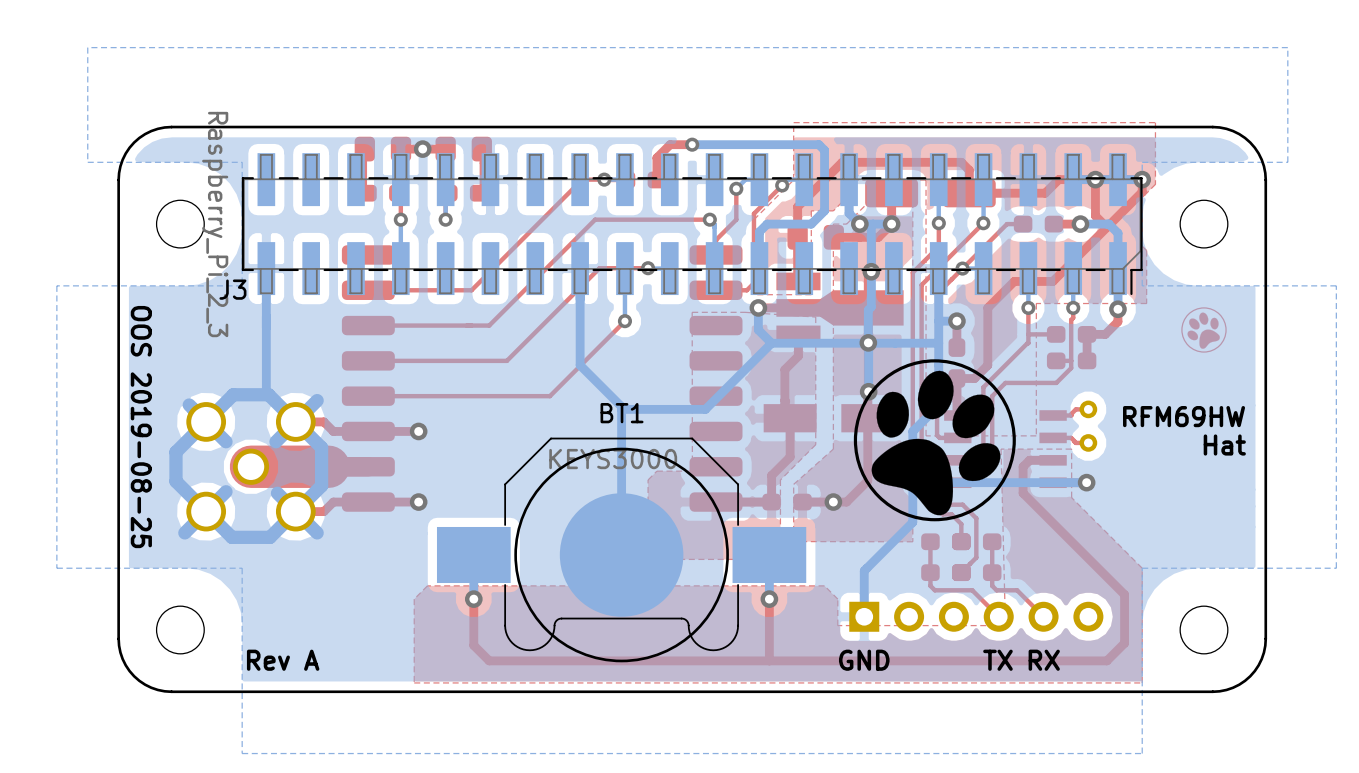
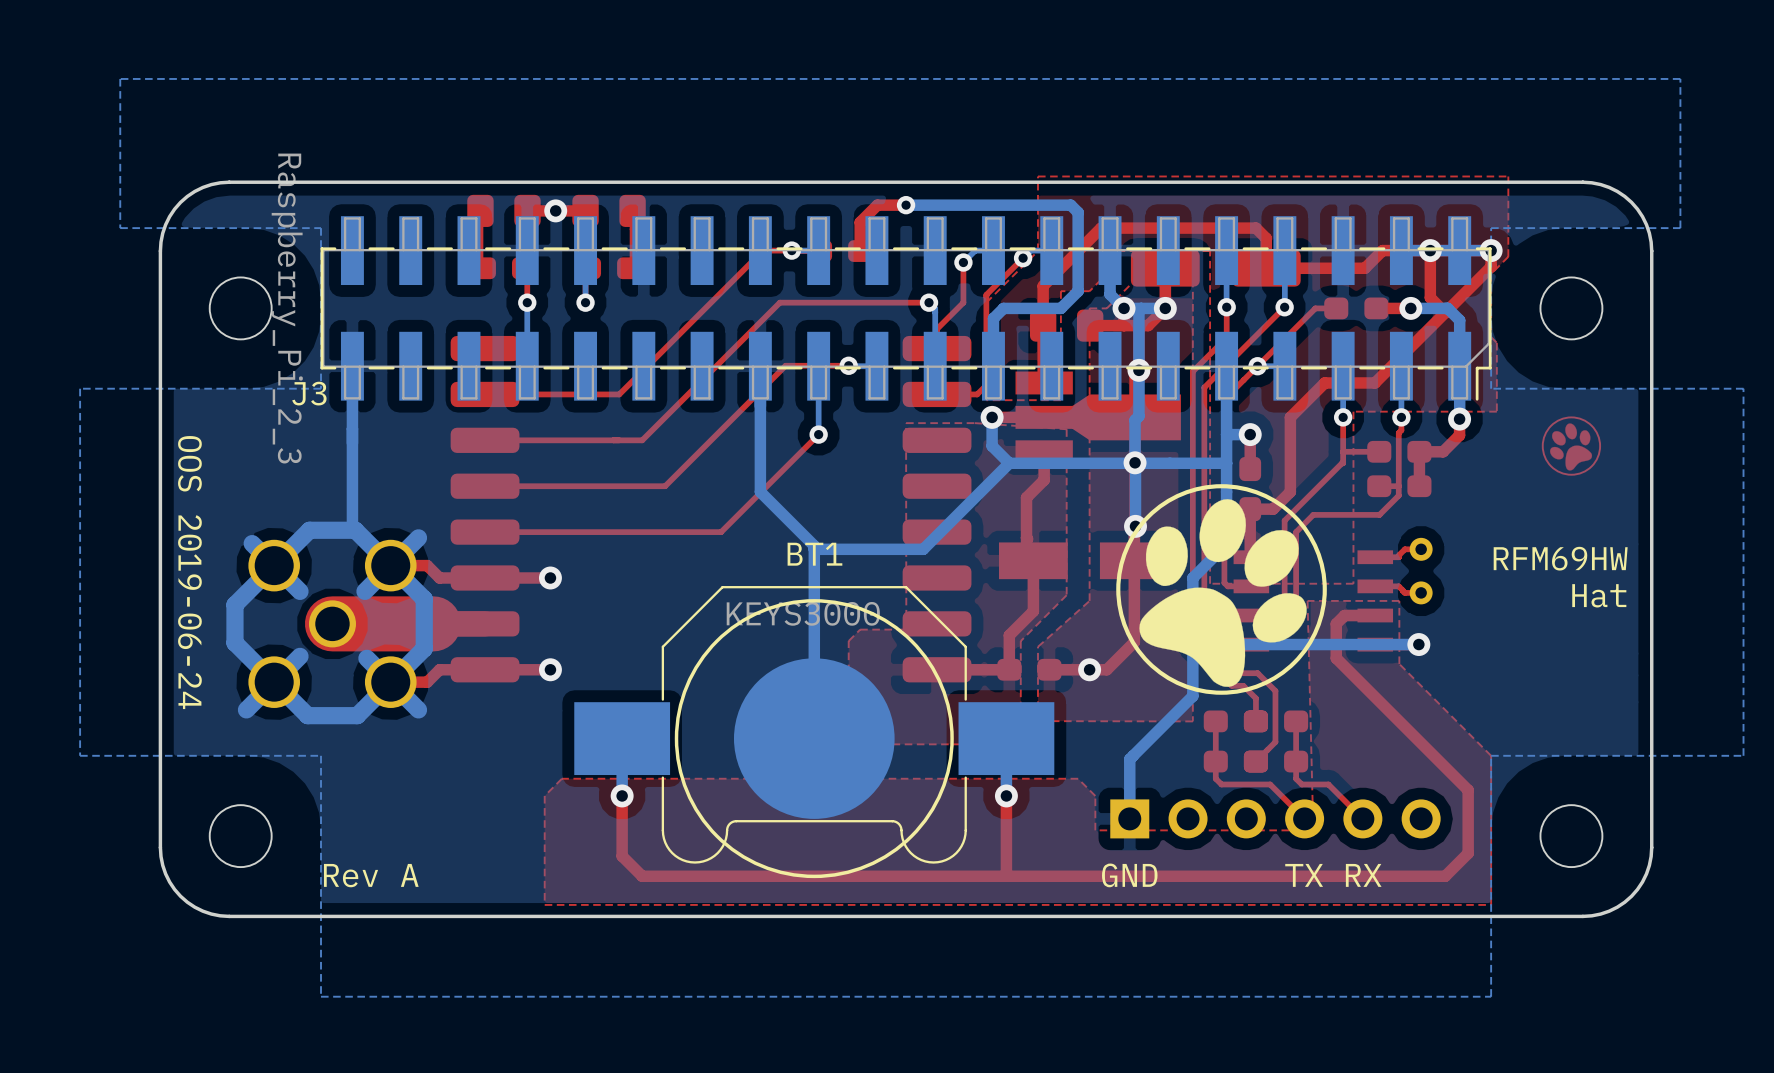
text: OOS 2019-08-25 (141, 427) -> OOS 2019-06-24 (189, 572)

